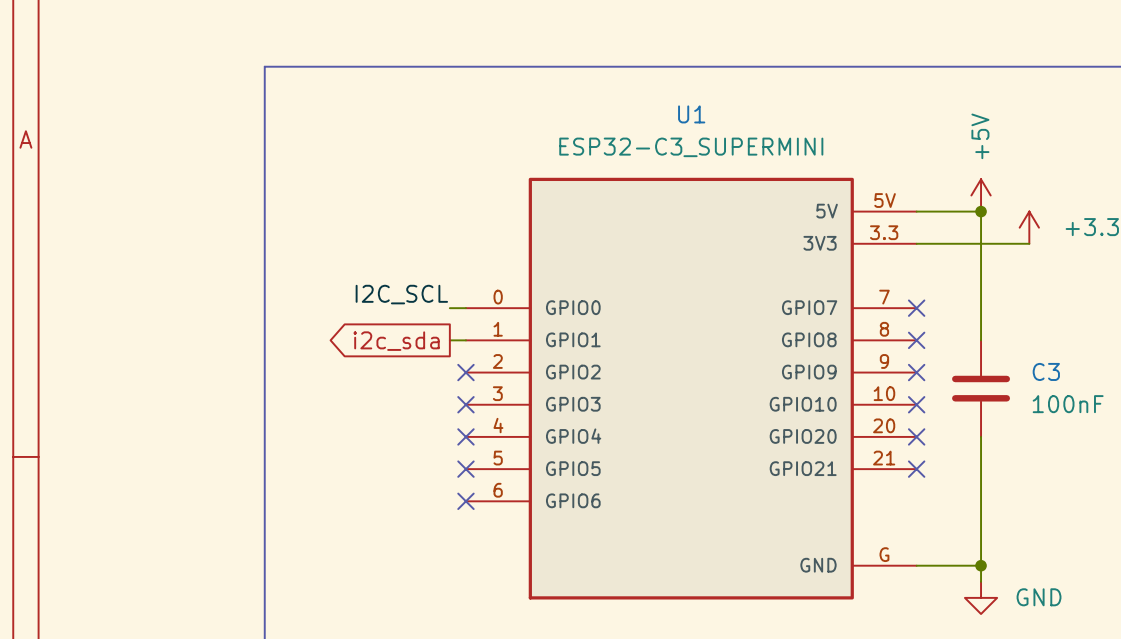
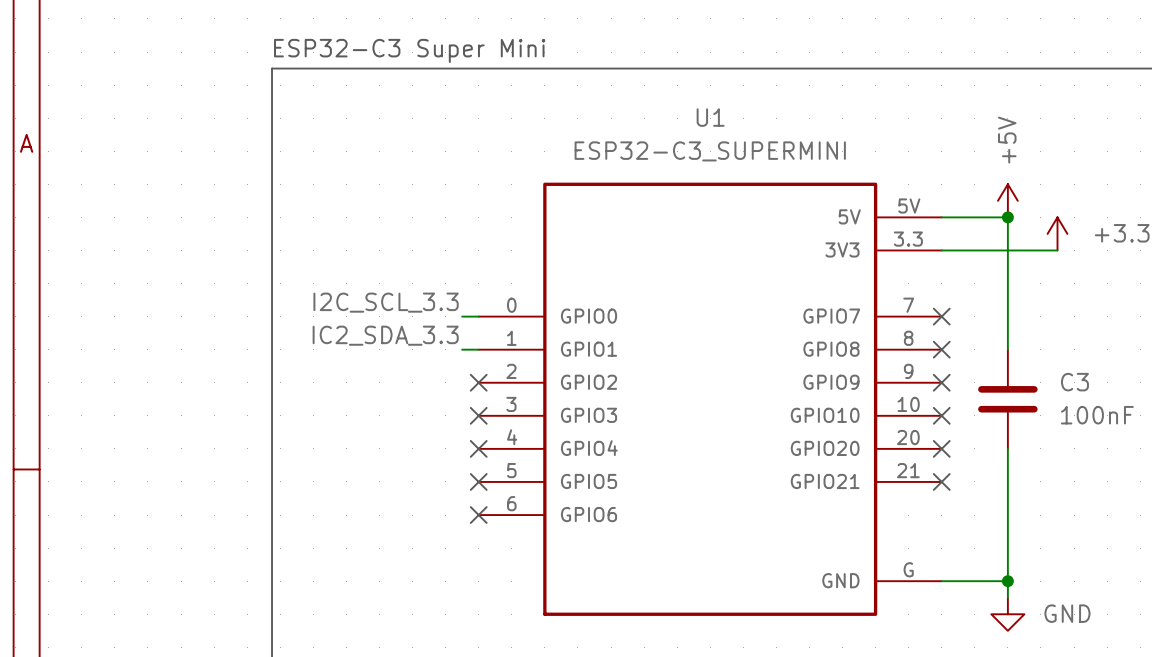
text: none -> ESP32-C3 Super Mini (409, 50)
label: I2C_SCL (401, 294) -> I2C_SCL_3.3 (386, 302)
label: none -> IC2_SDA_3.3 (385, 335)
global label: i2c_sda (396, 341) -> none

